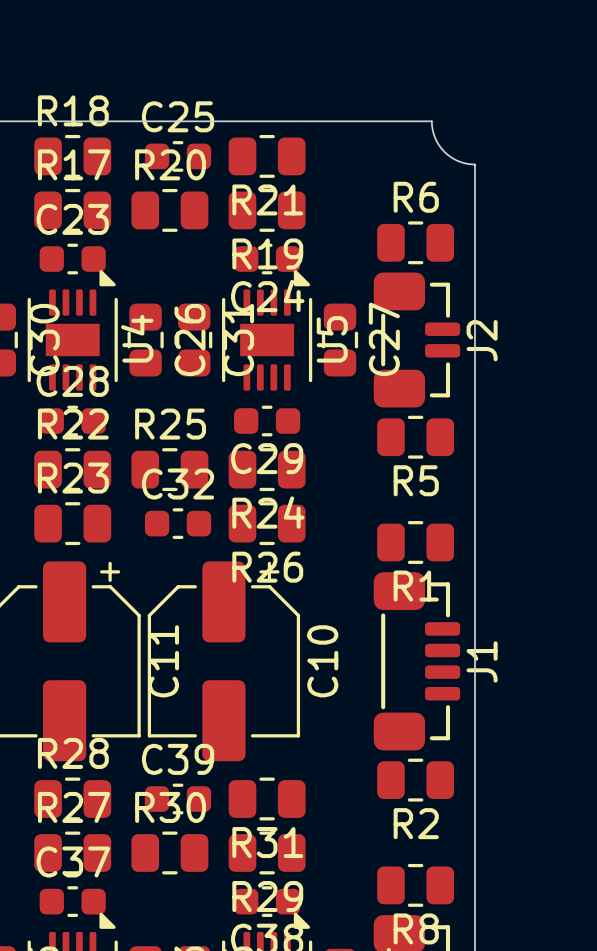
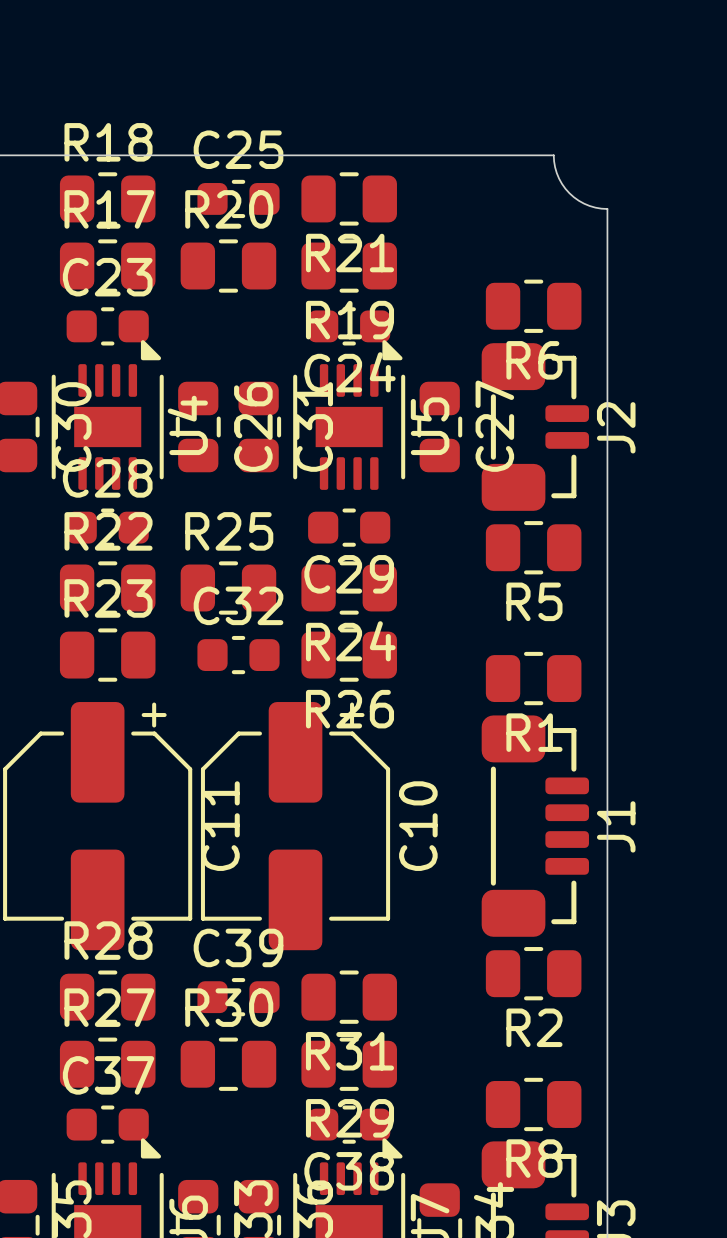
R6 name position: R6 (416, 197) -> R6 (534, 360)

